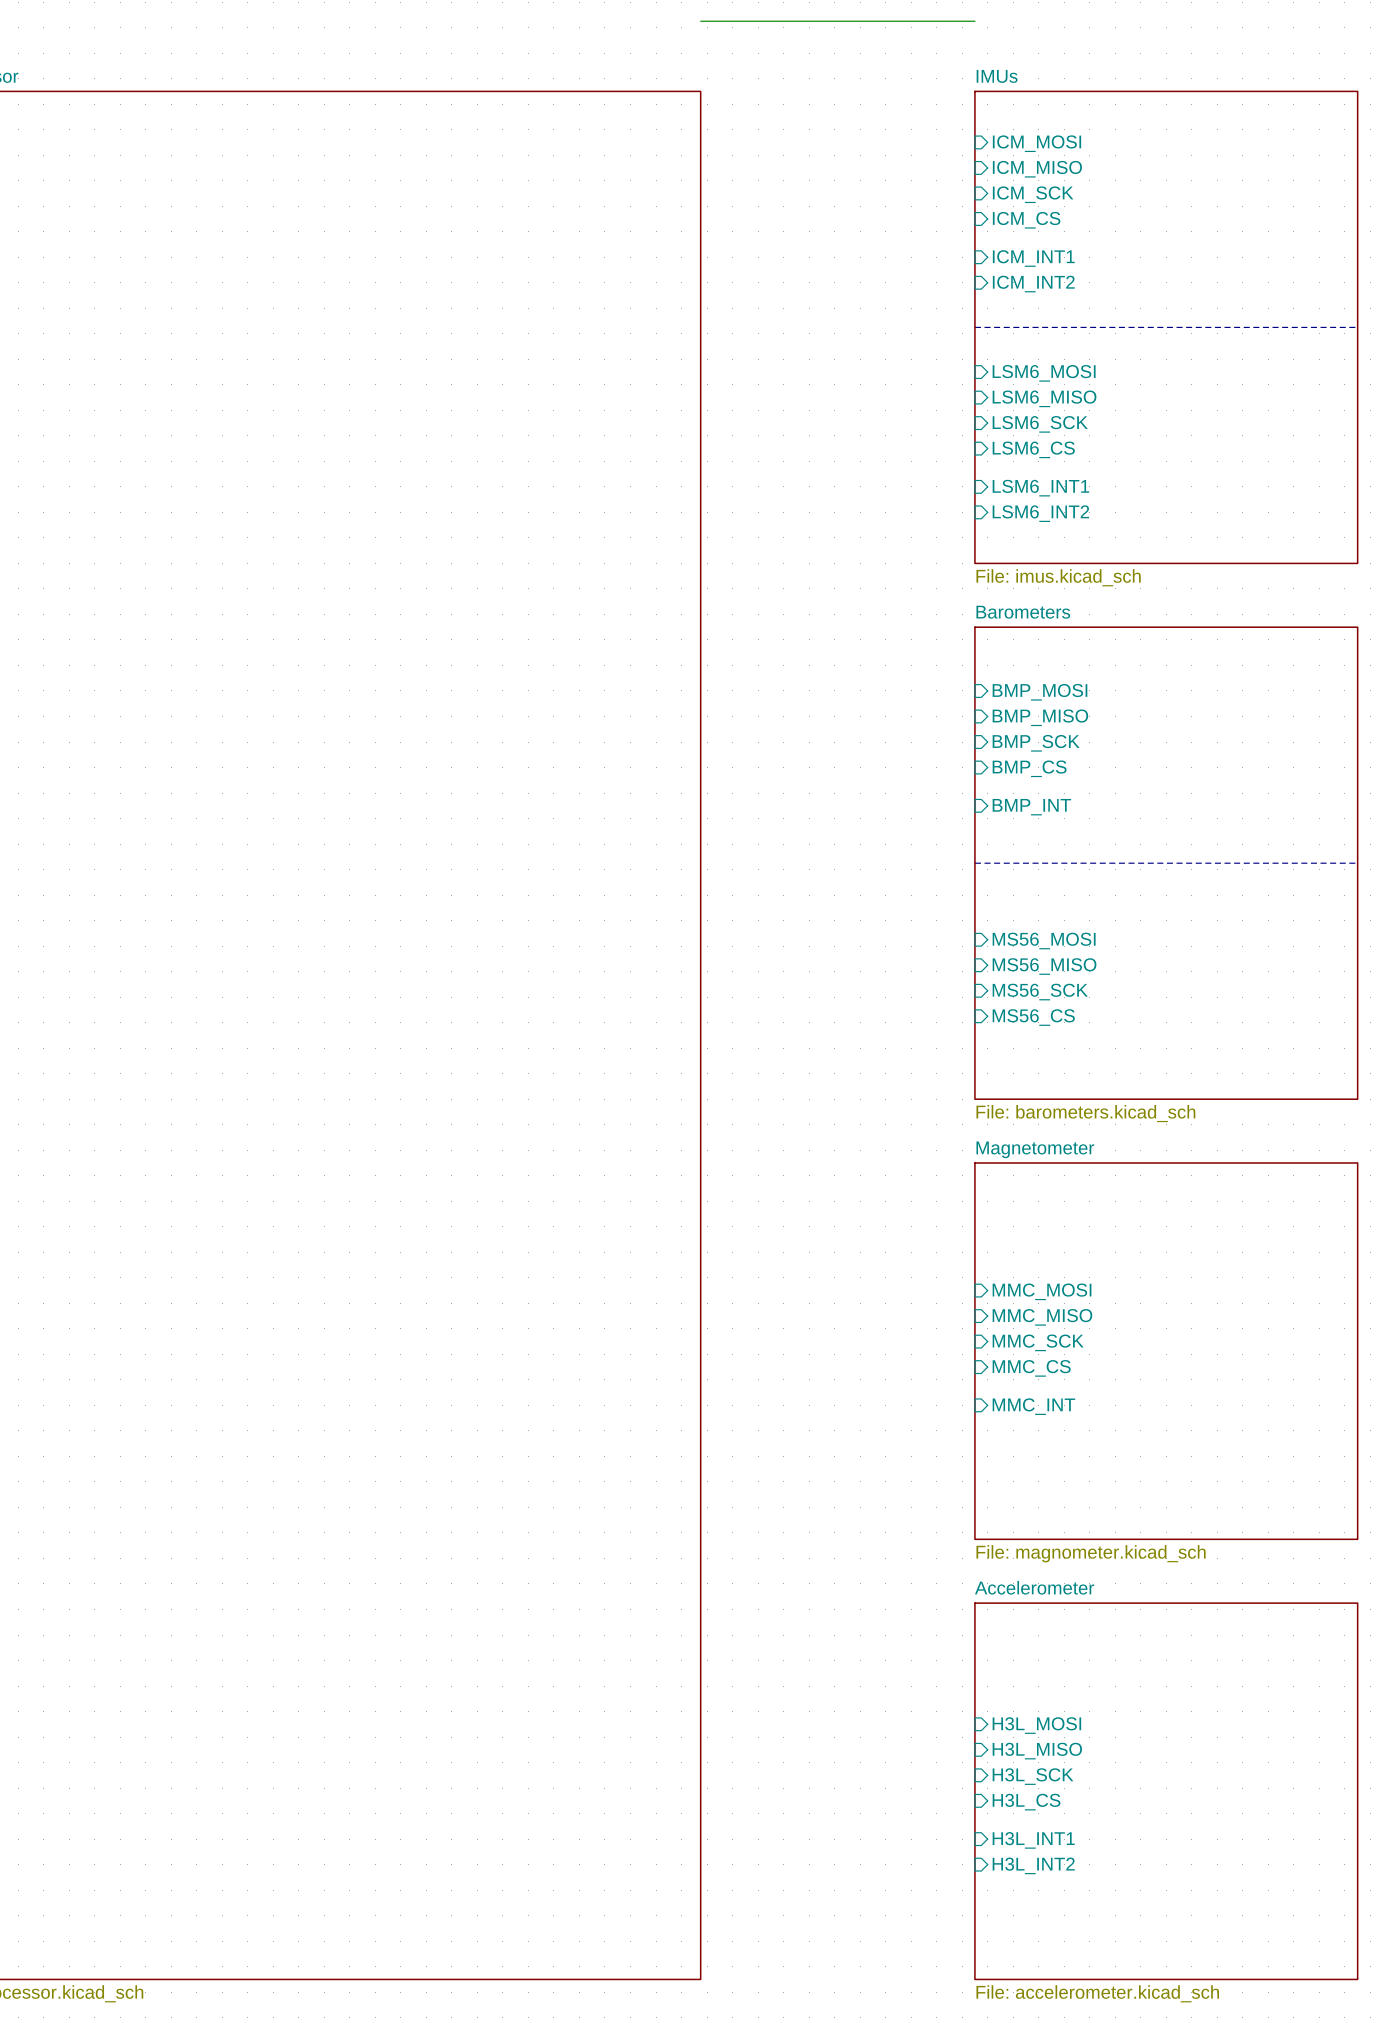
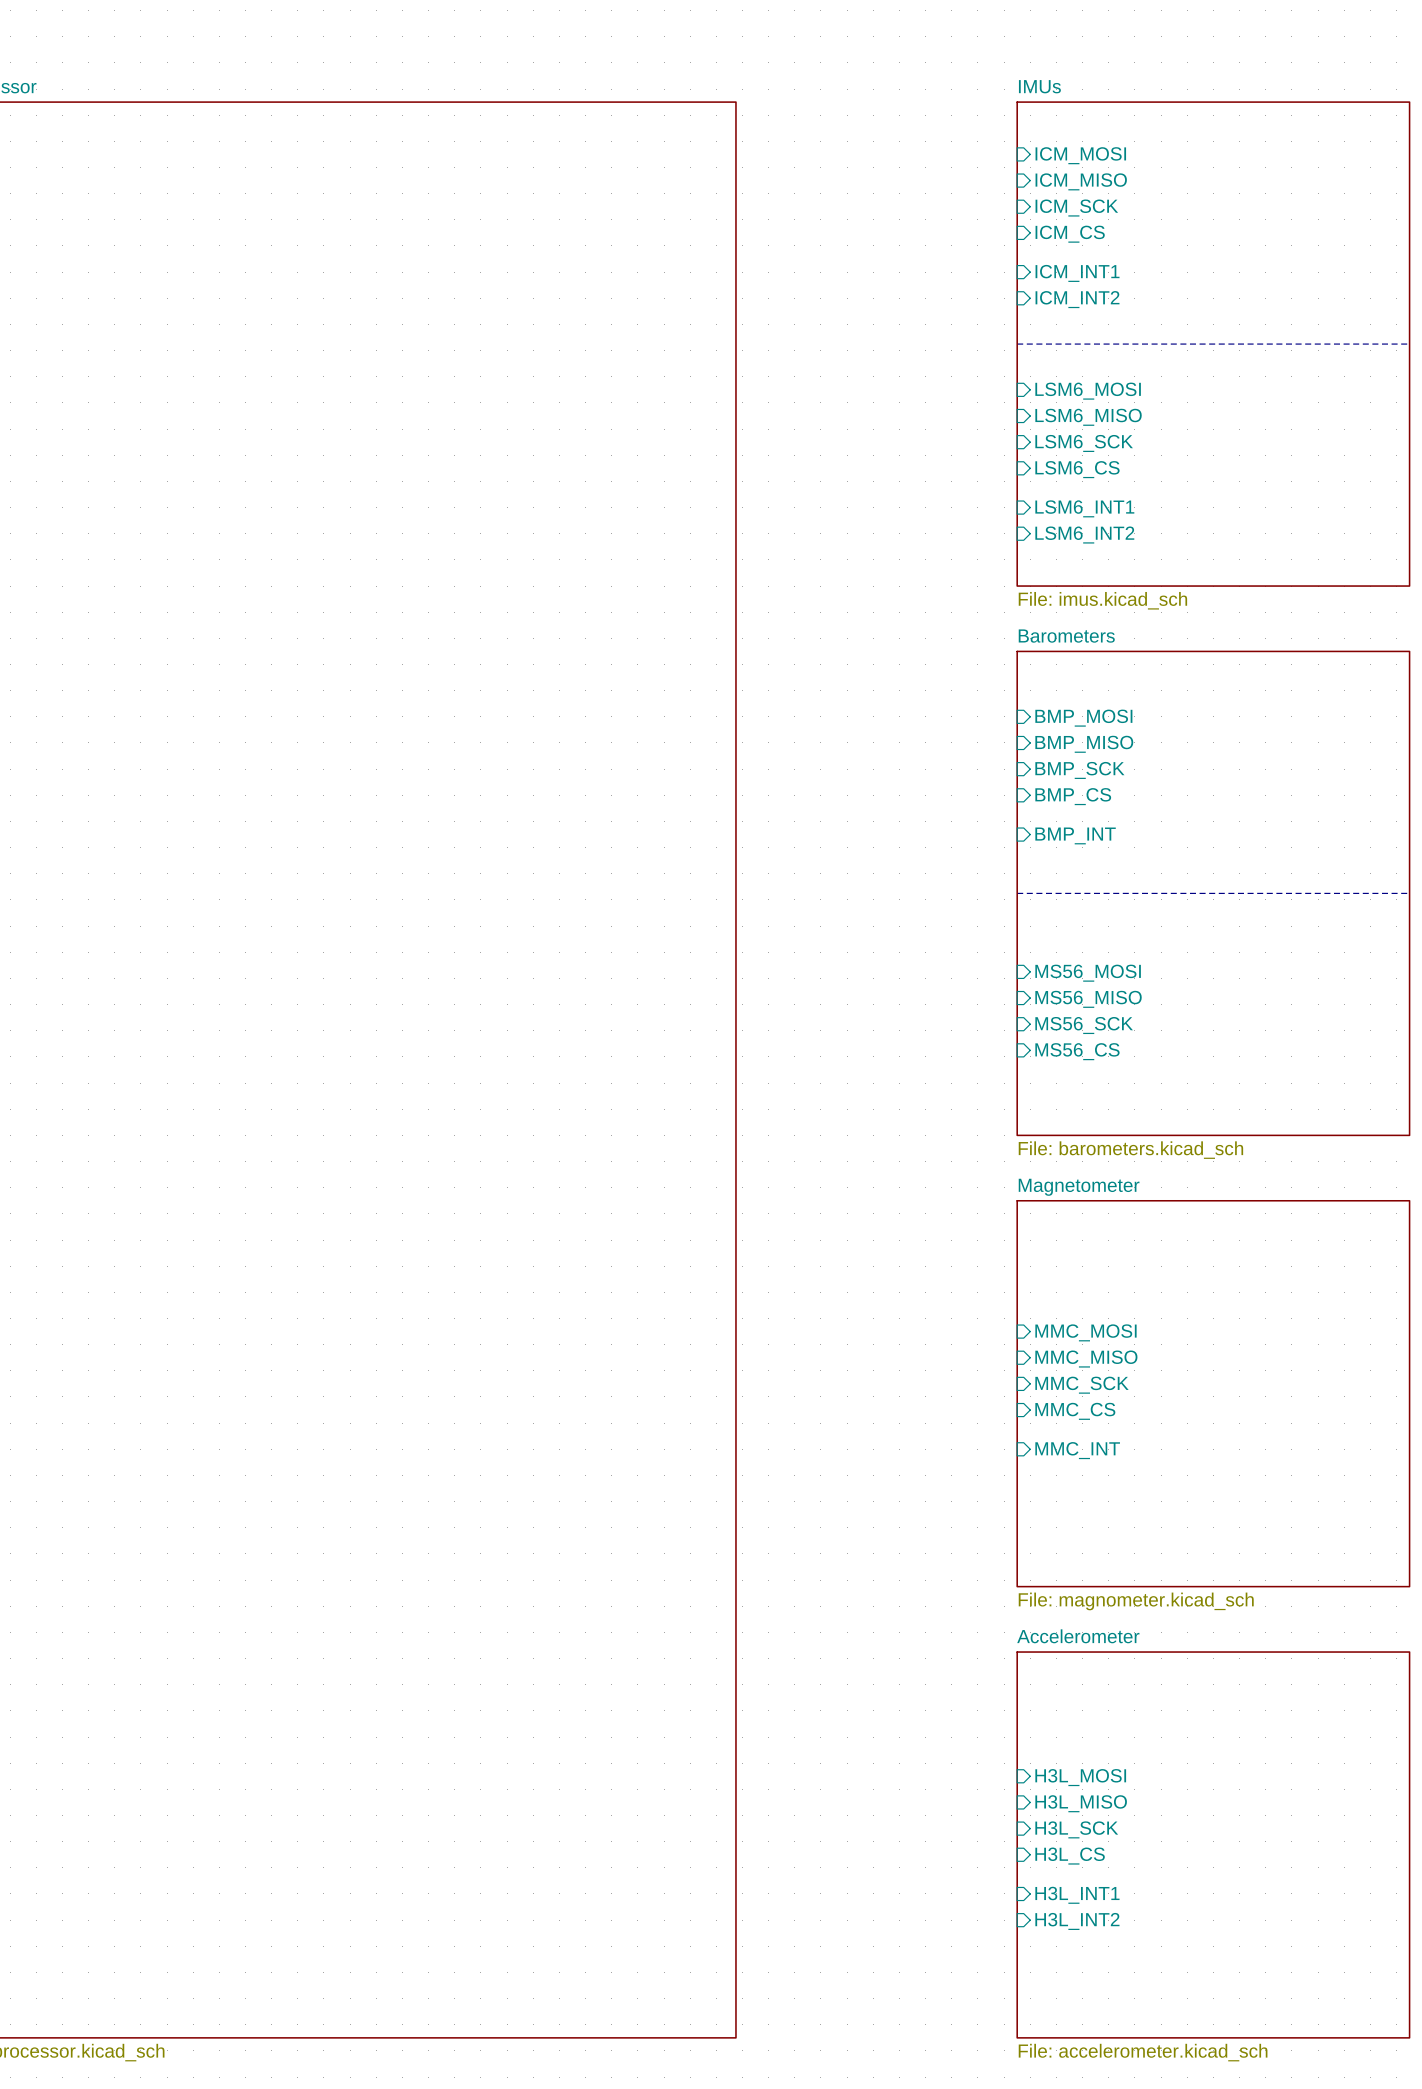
wire: (700, 21) (974, 21) -> none

